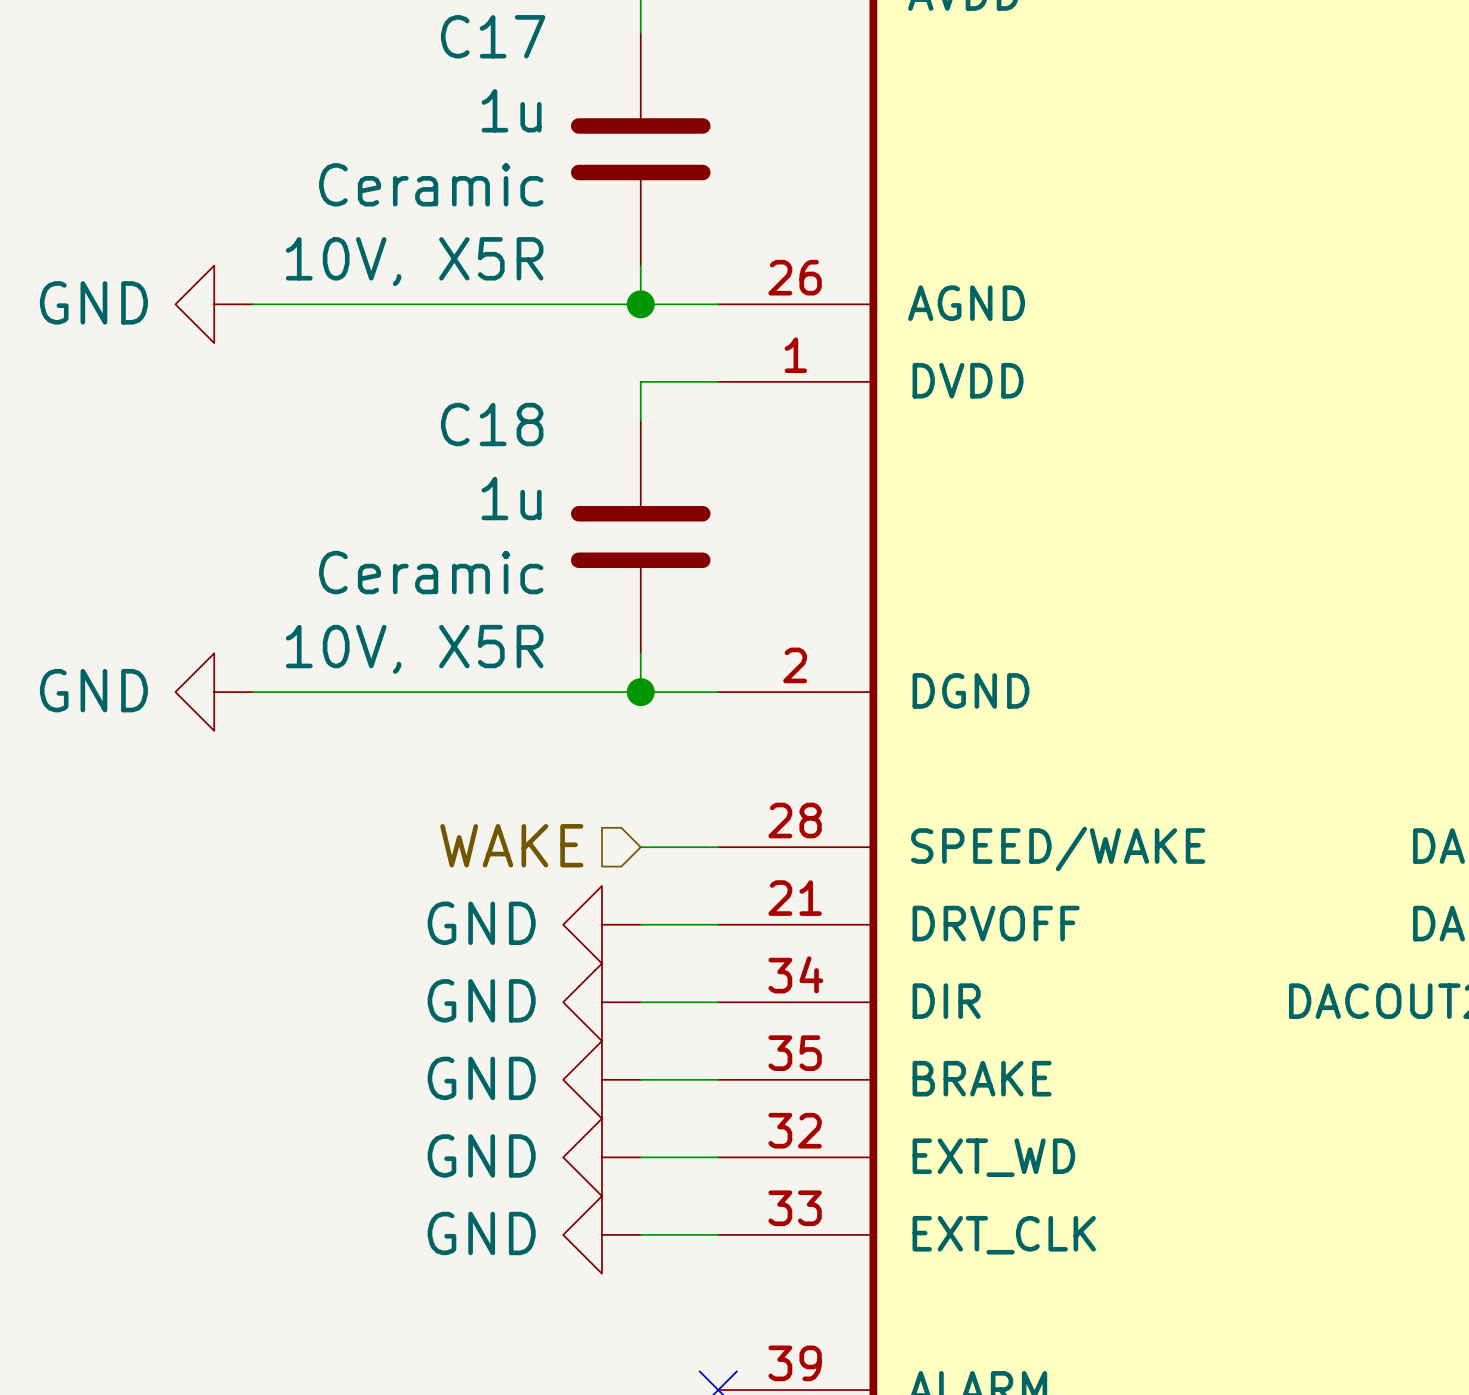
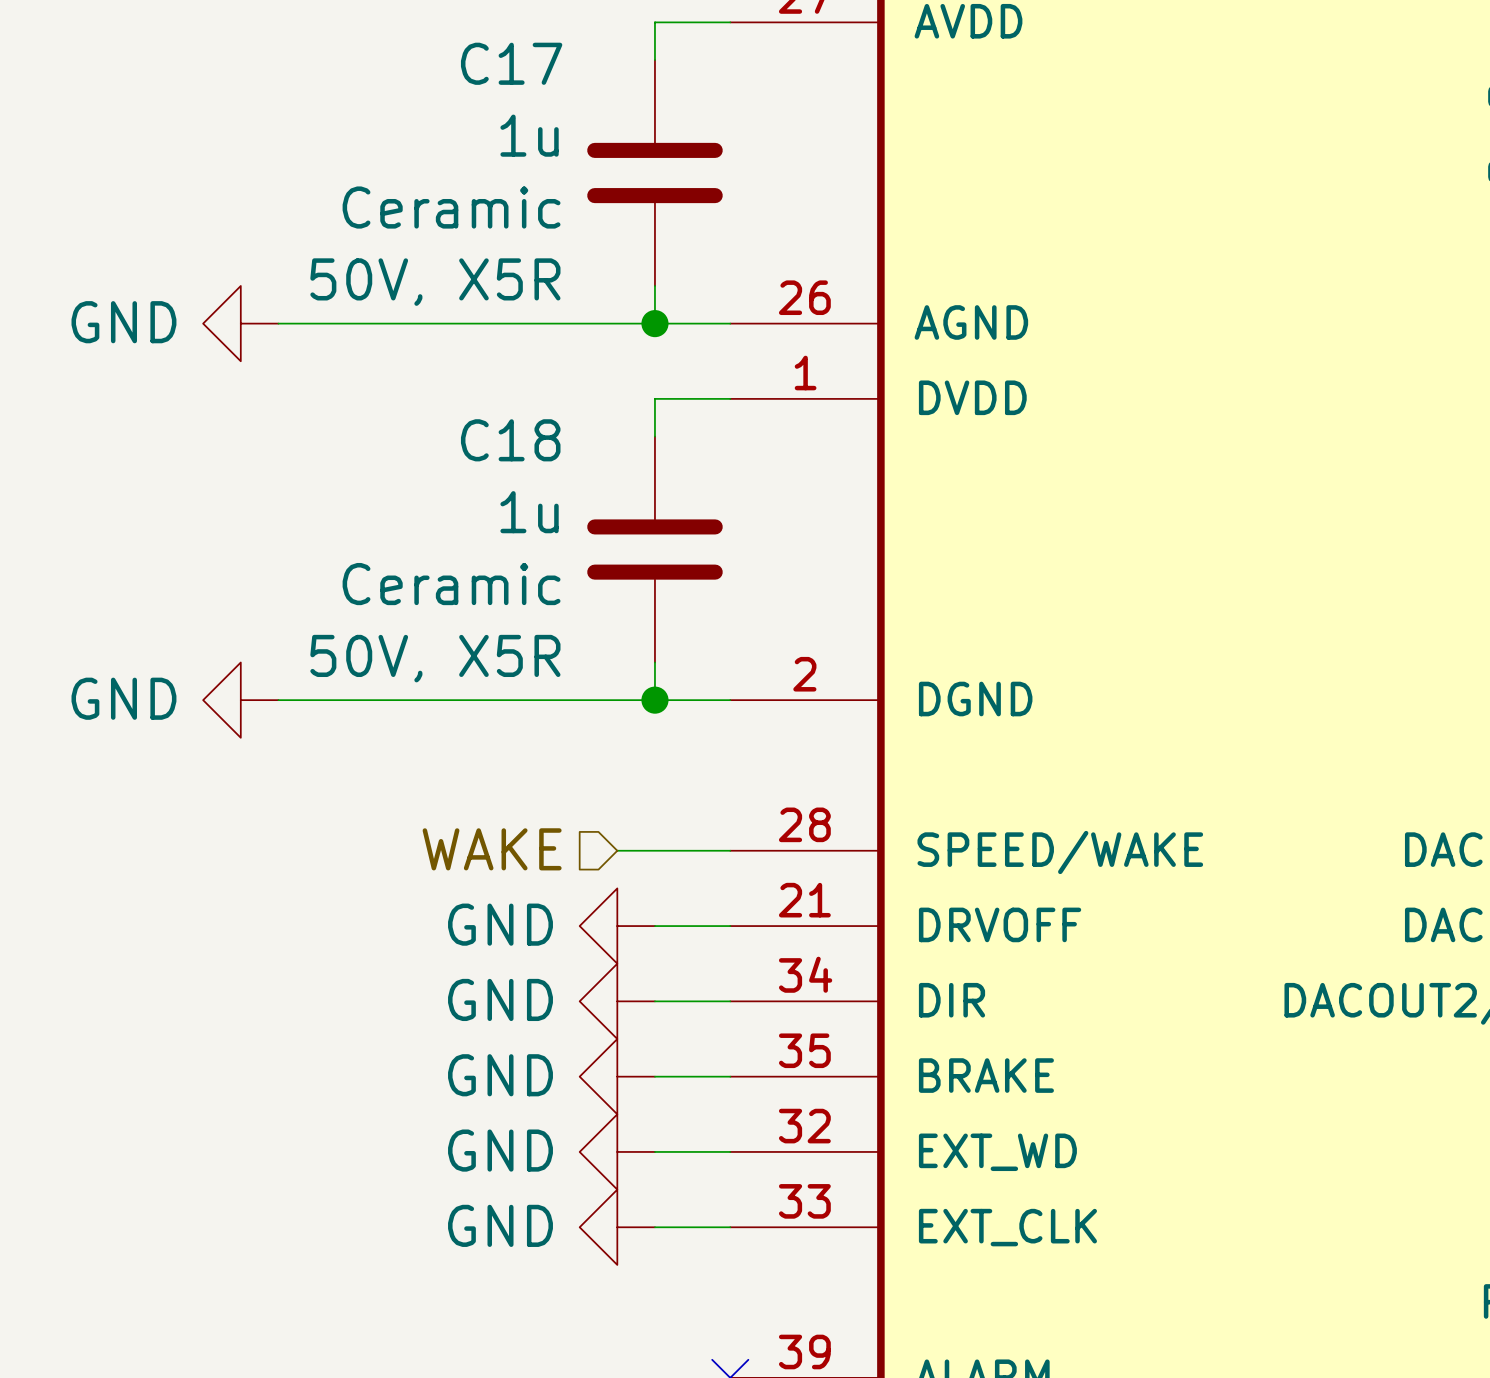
C17 text: 10V, X5R (414, 261) -> 50V, X5R (435, 282)
C18 text: 10V, X5R (414, 649) -> 50V, X5R (435, 658)
hierarchical label position: WAKE (511, 845) -> WAKE (492, 849)
wire: none -> (617, 850) (654, 850)

